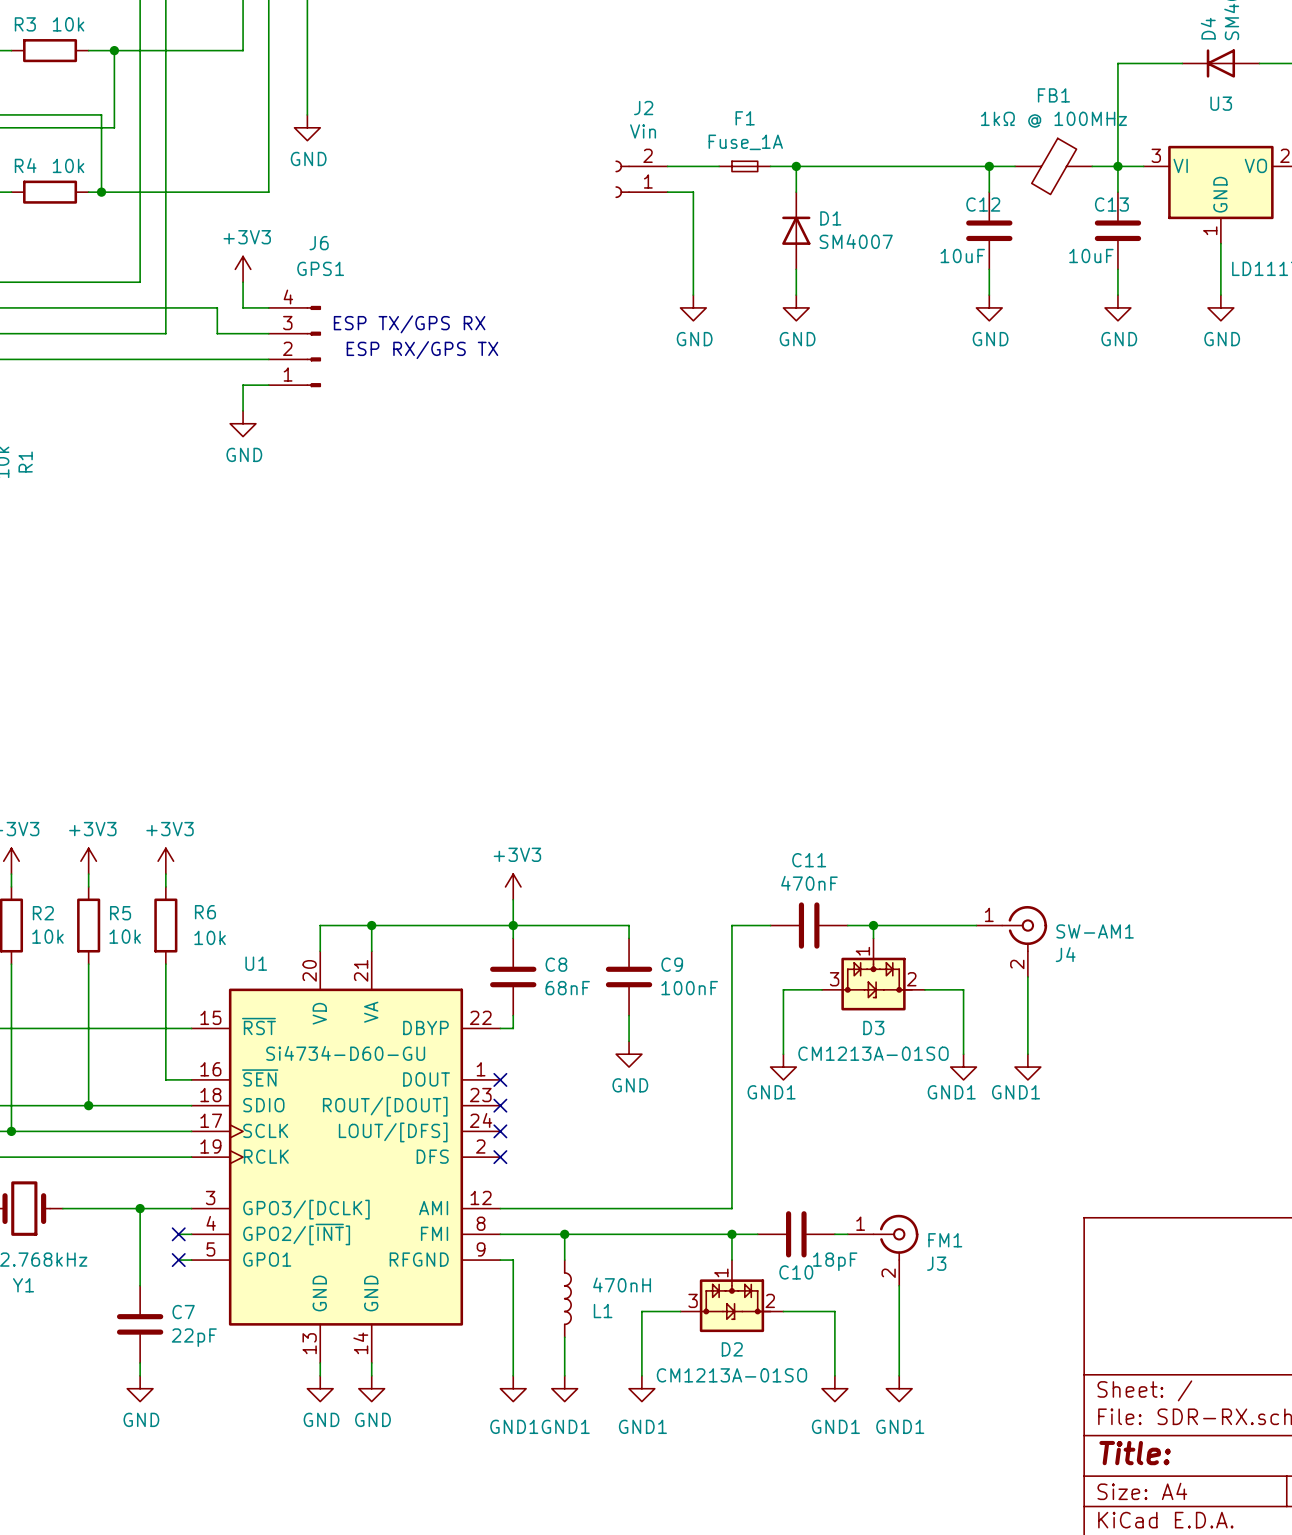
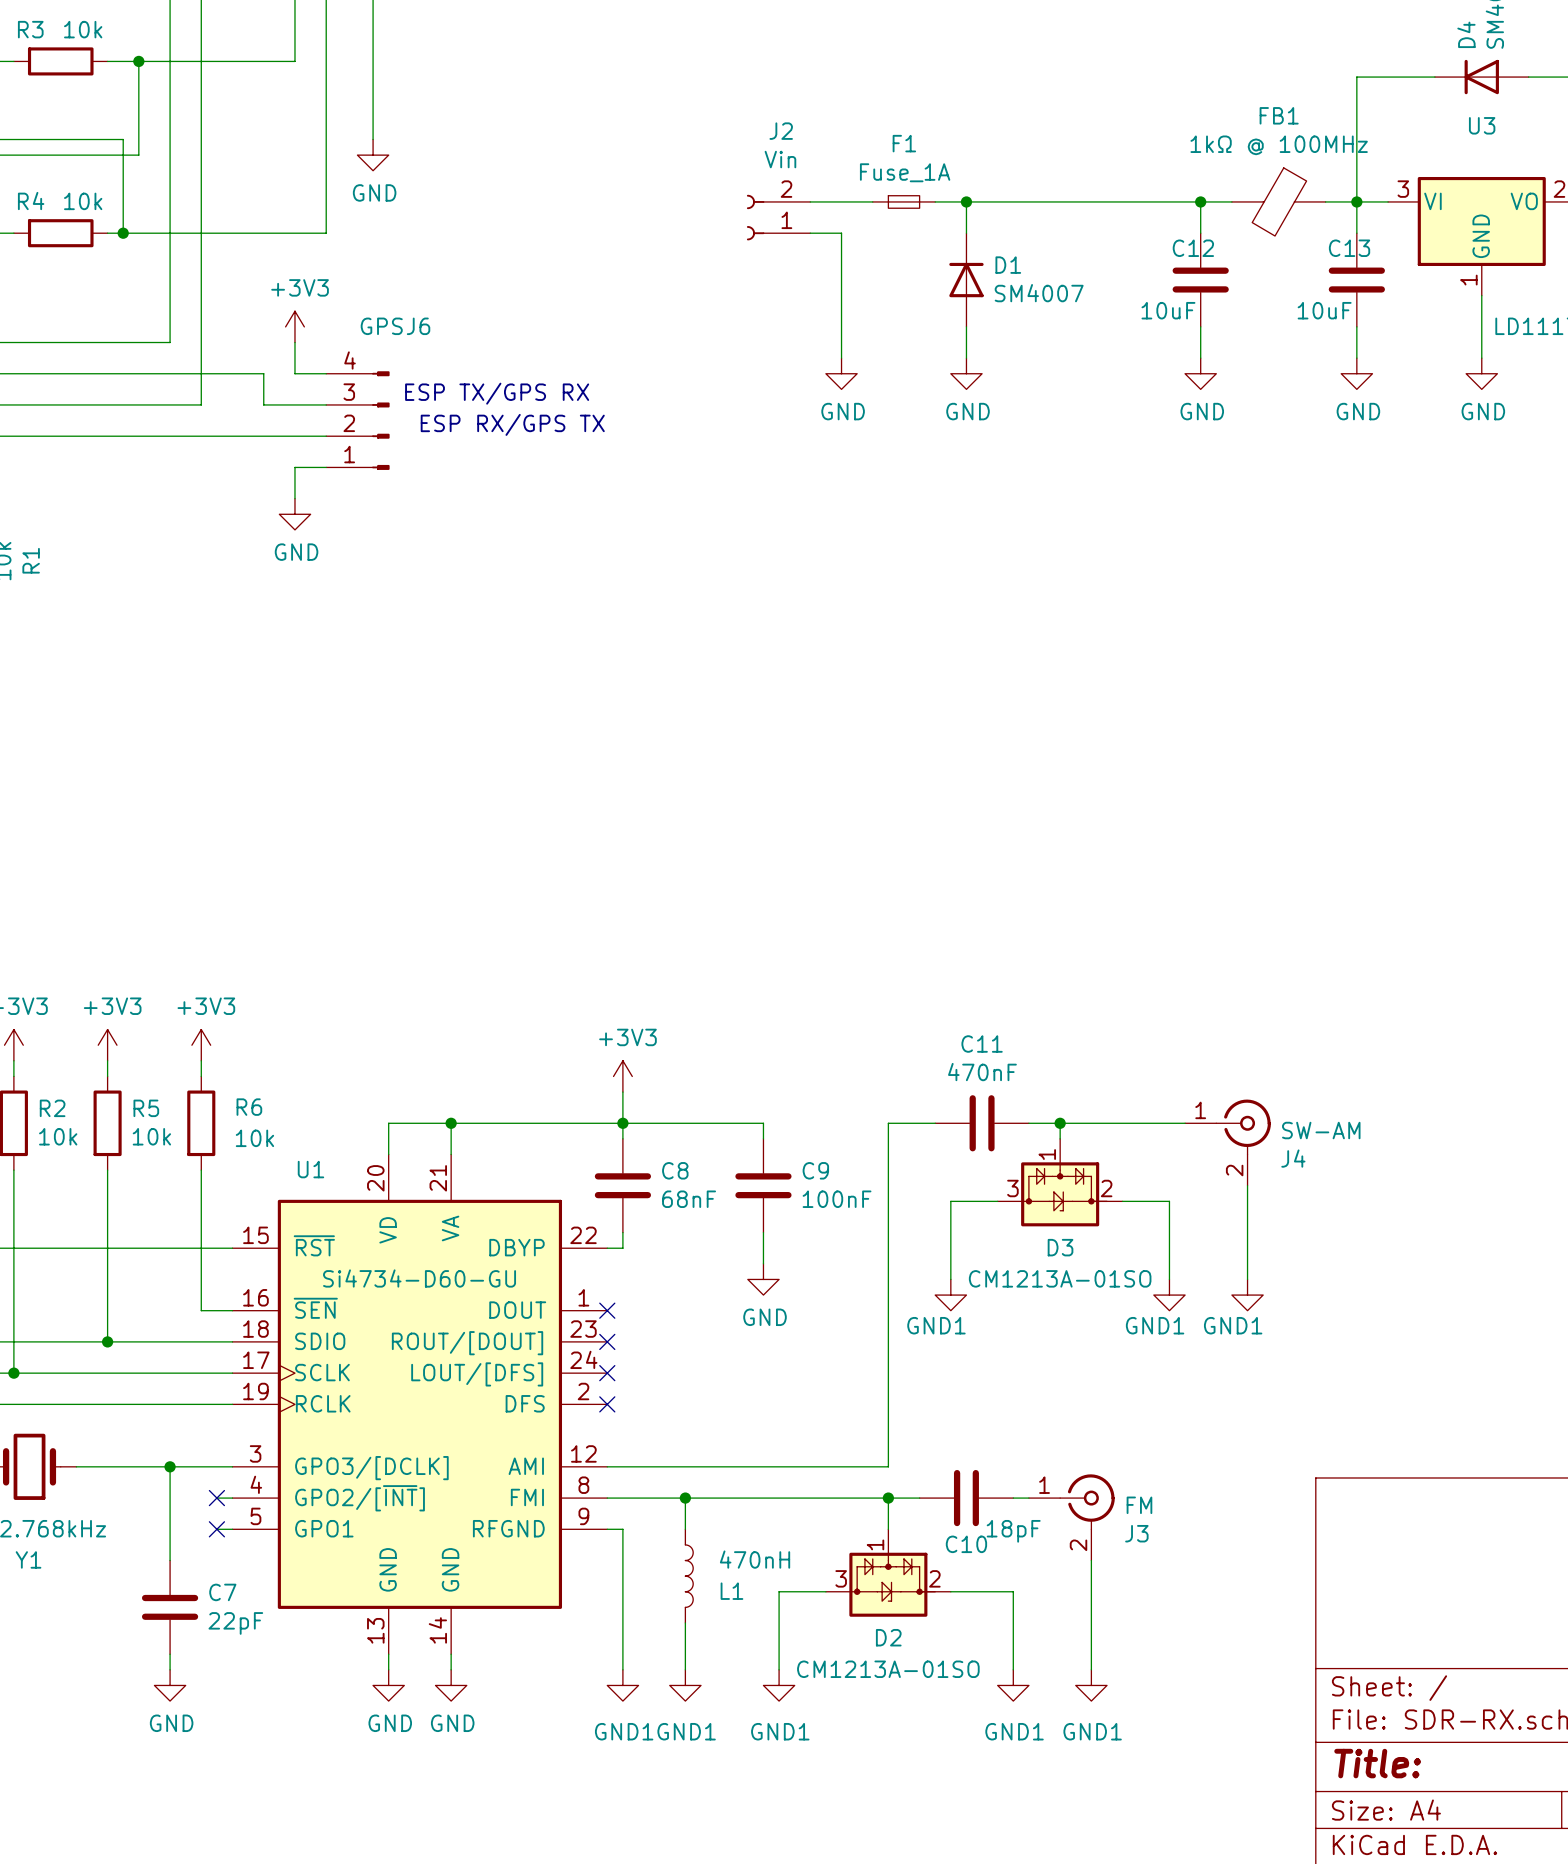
GPS1 value position: J6 (319, 243) -> J6 (418, 326)
GPS1 name: GPS1 (320, 268) -> GPS (381, 326)
SW-AM1 name: SW-AM1 (1095, 931) -> SW-AM (1321, 1130)
FM1 name: FM1 (945, 1240) -> FM (1139, 1505)

